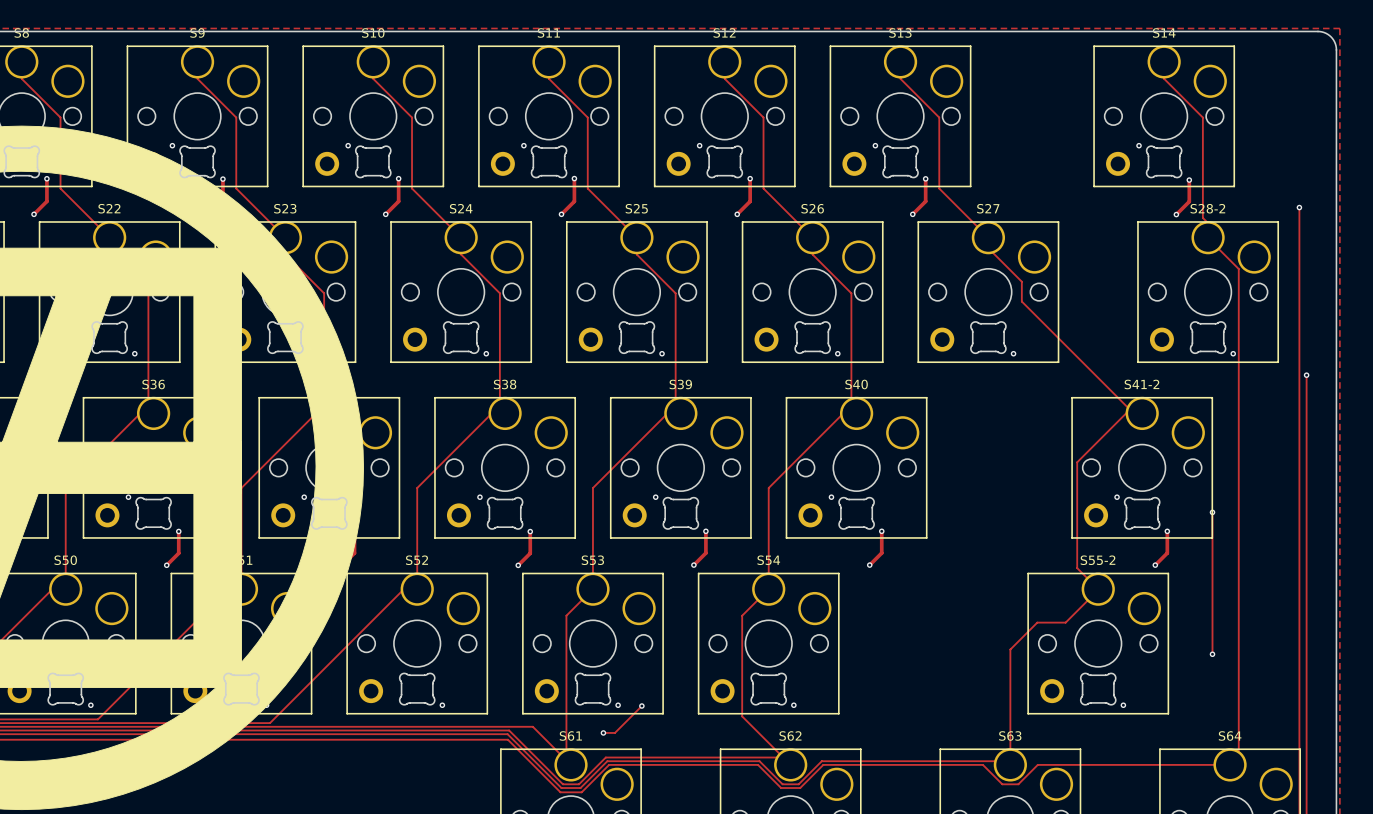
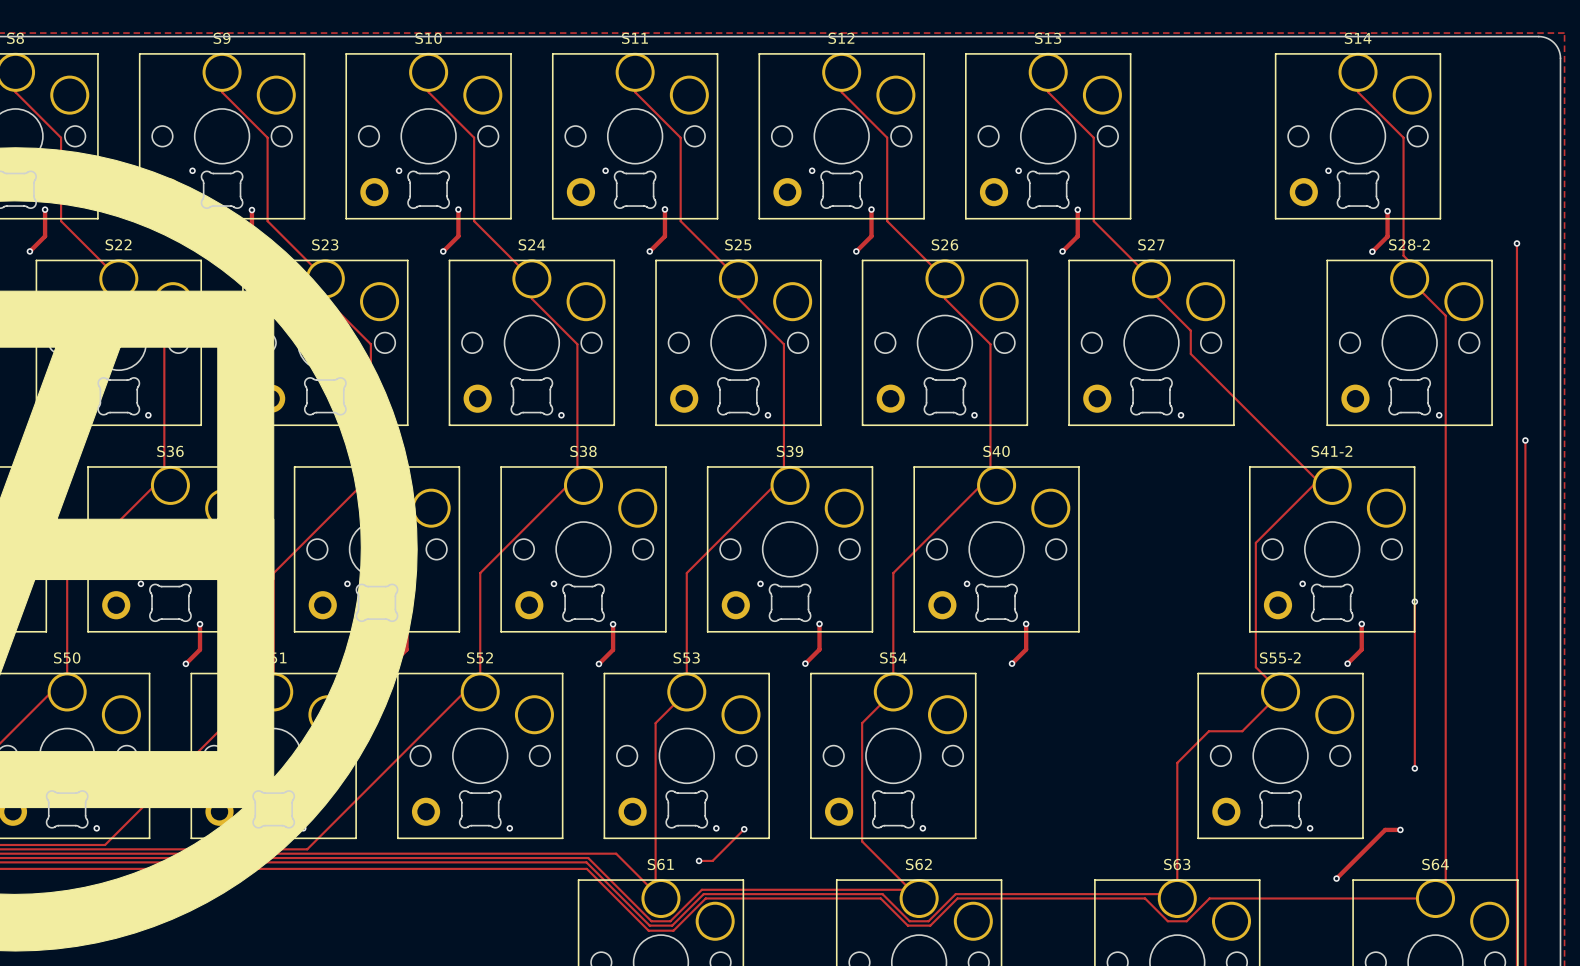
track: none -> (1400, 829) (1385, 829) (1336, 878)
via: none -> (1400, 829)
via: none -> (1336, 878)

